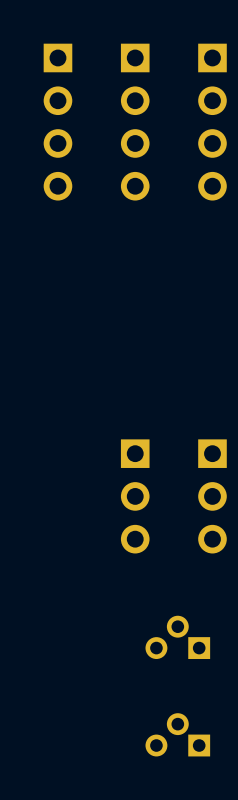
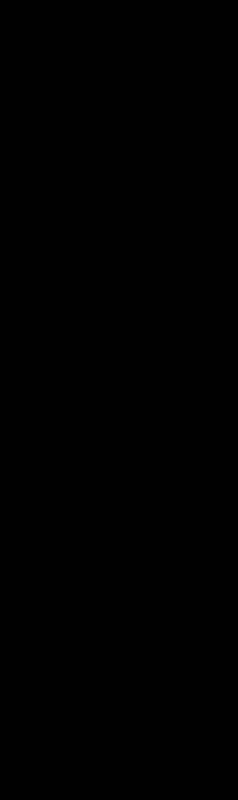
part: (57, 122) -> none
part: (135, 122) -> none
part: (212, 122) -> none
part: (135, 496) -> none
part: (212, 496) -> none
part: (177, 637) -> none
part: (177, 734) -> none

